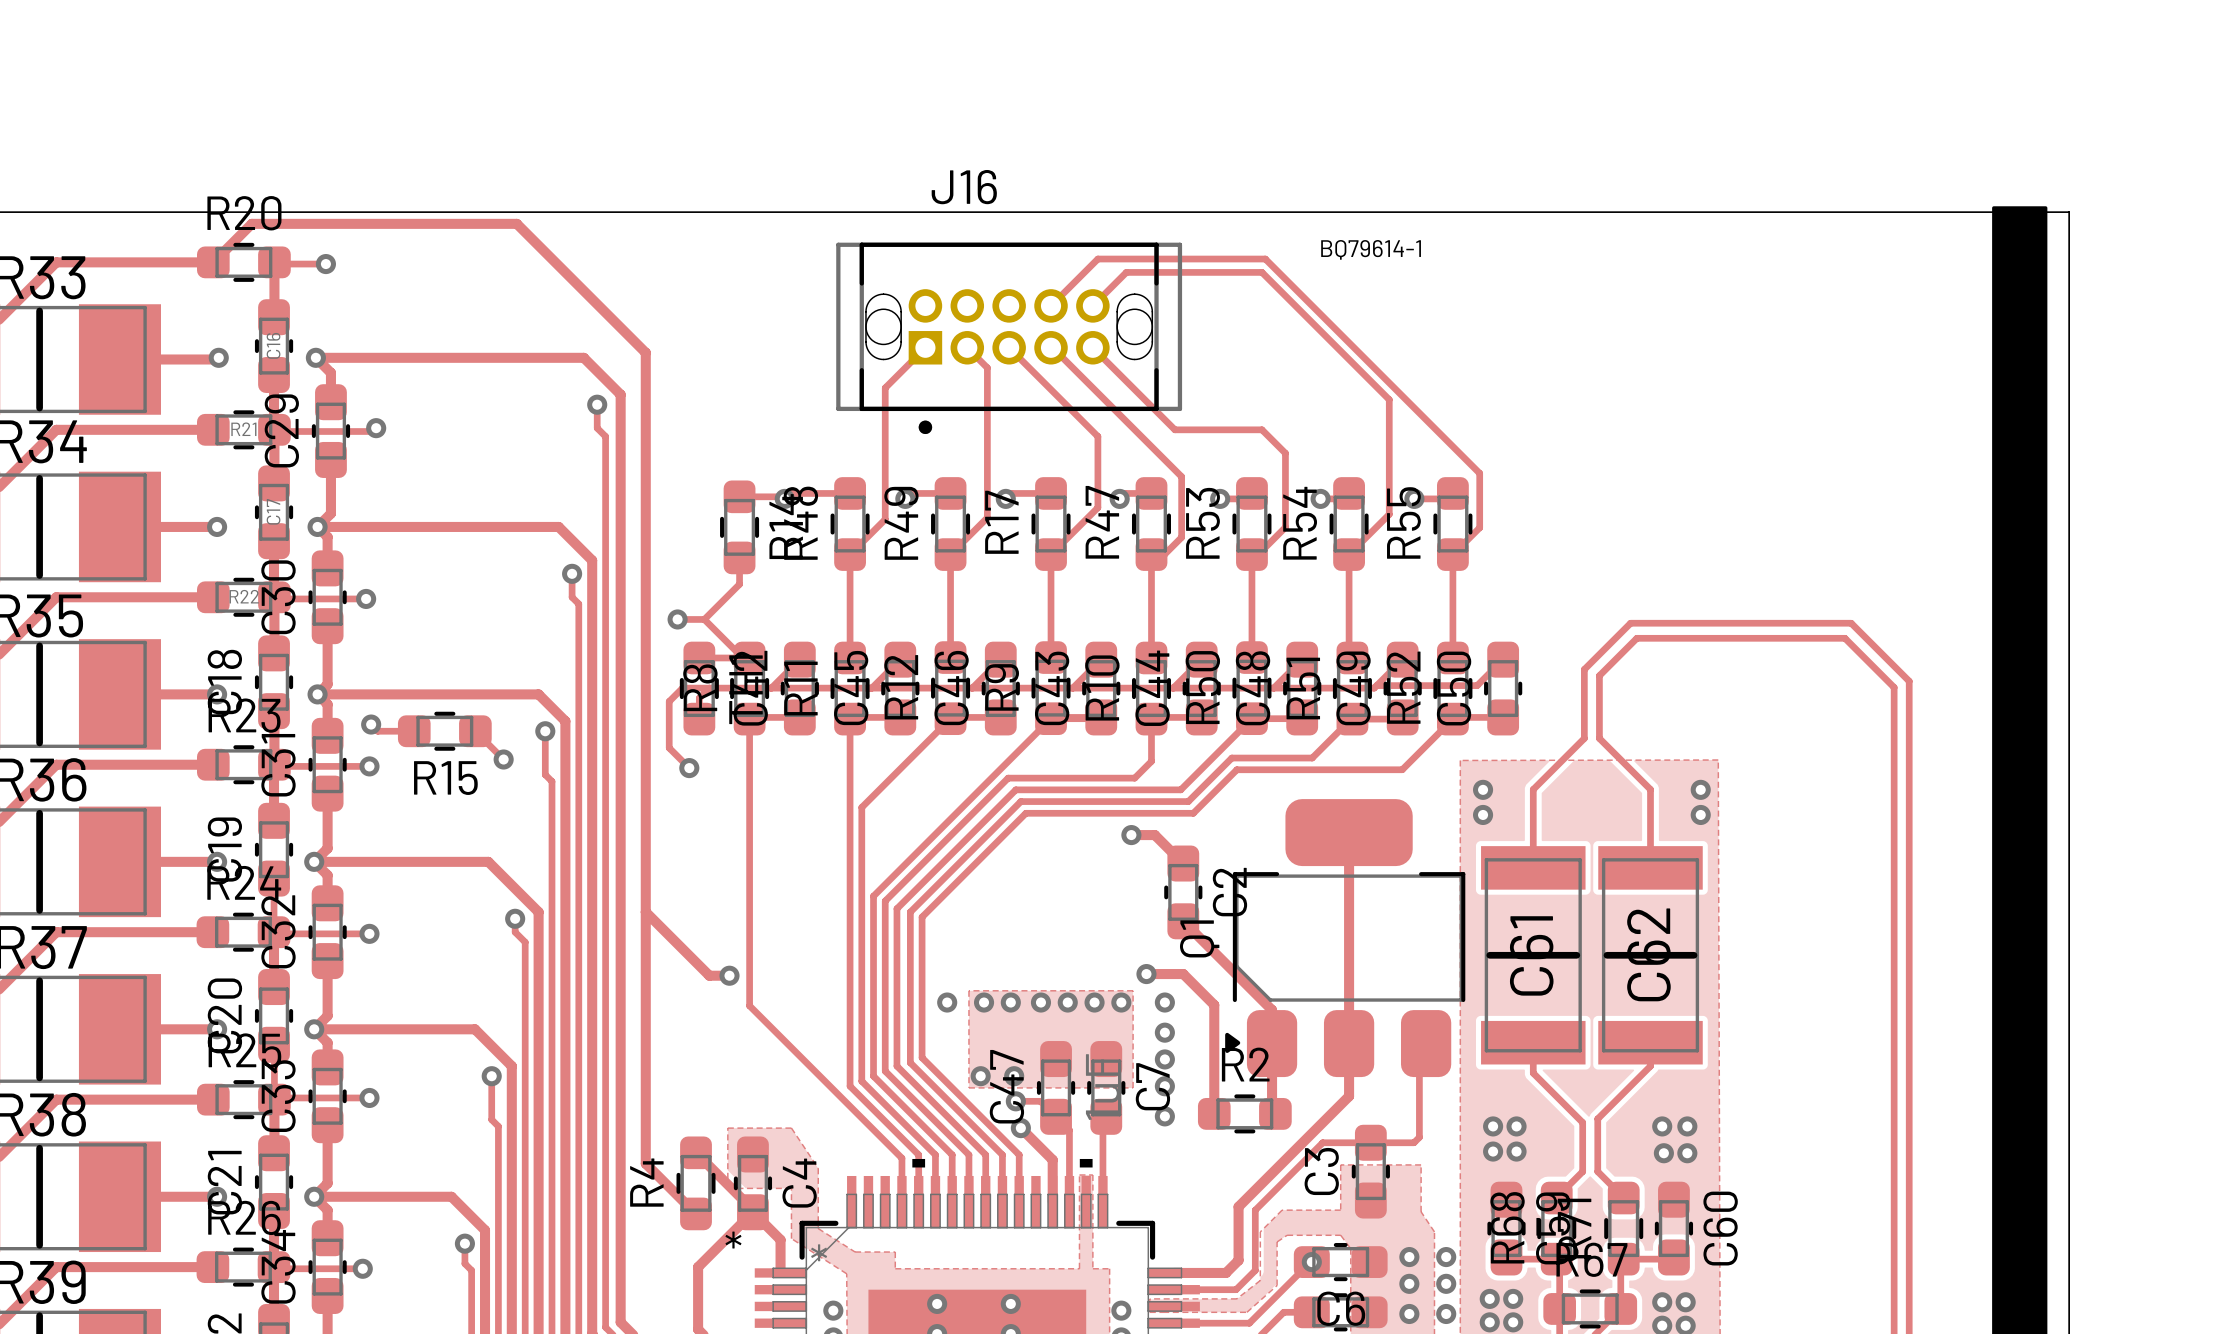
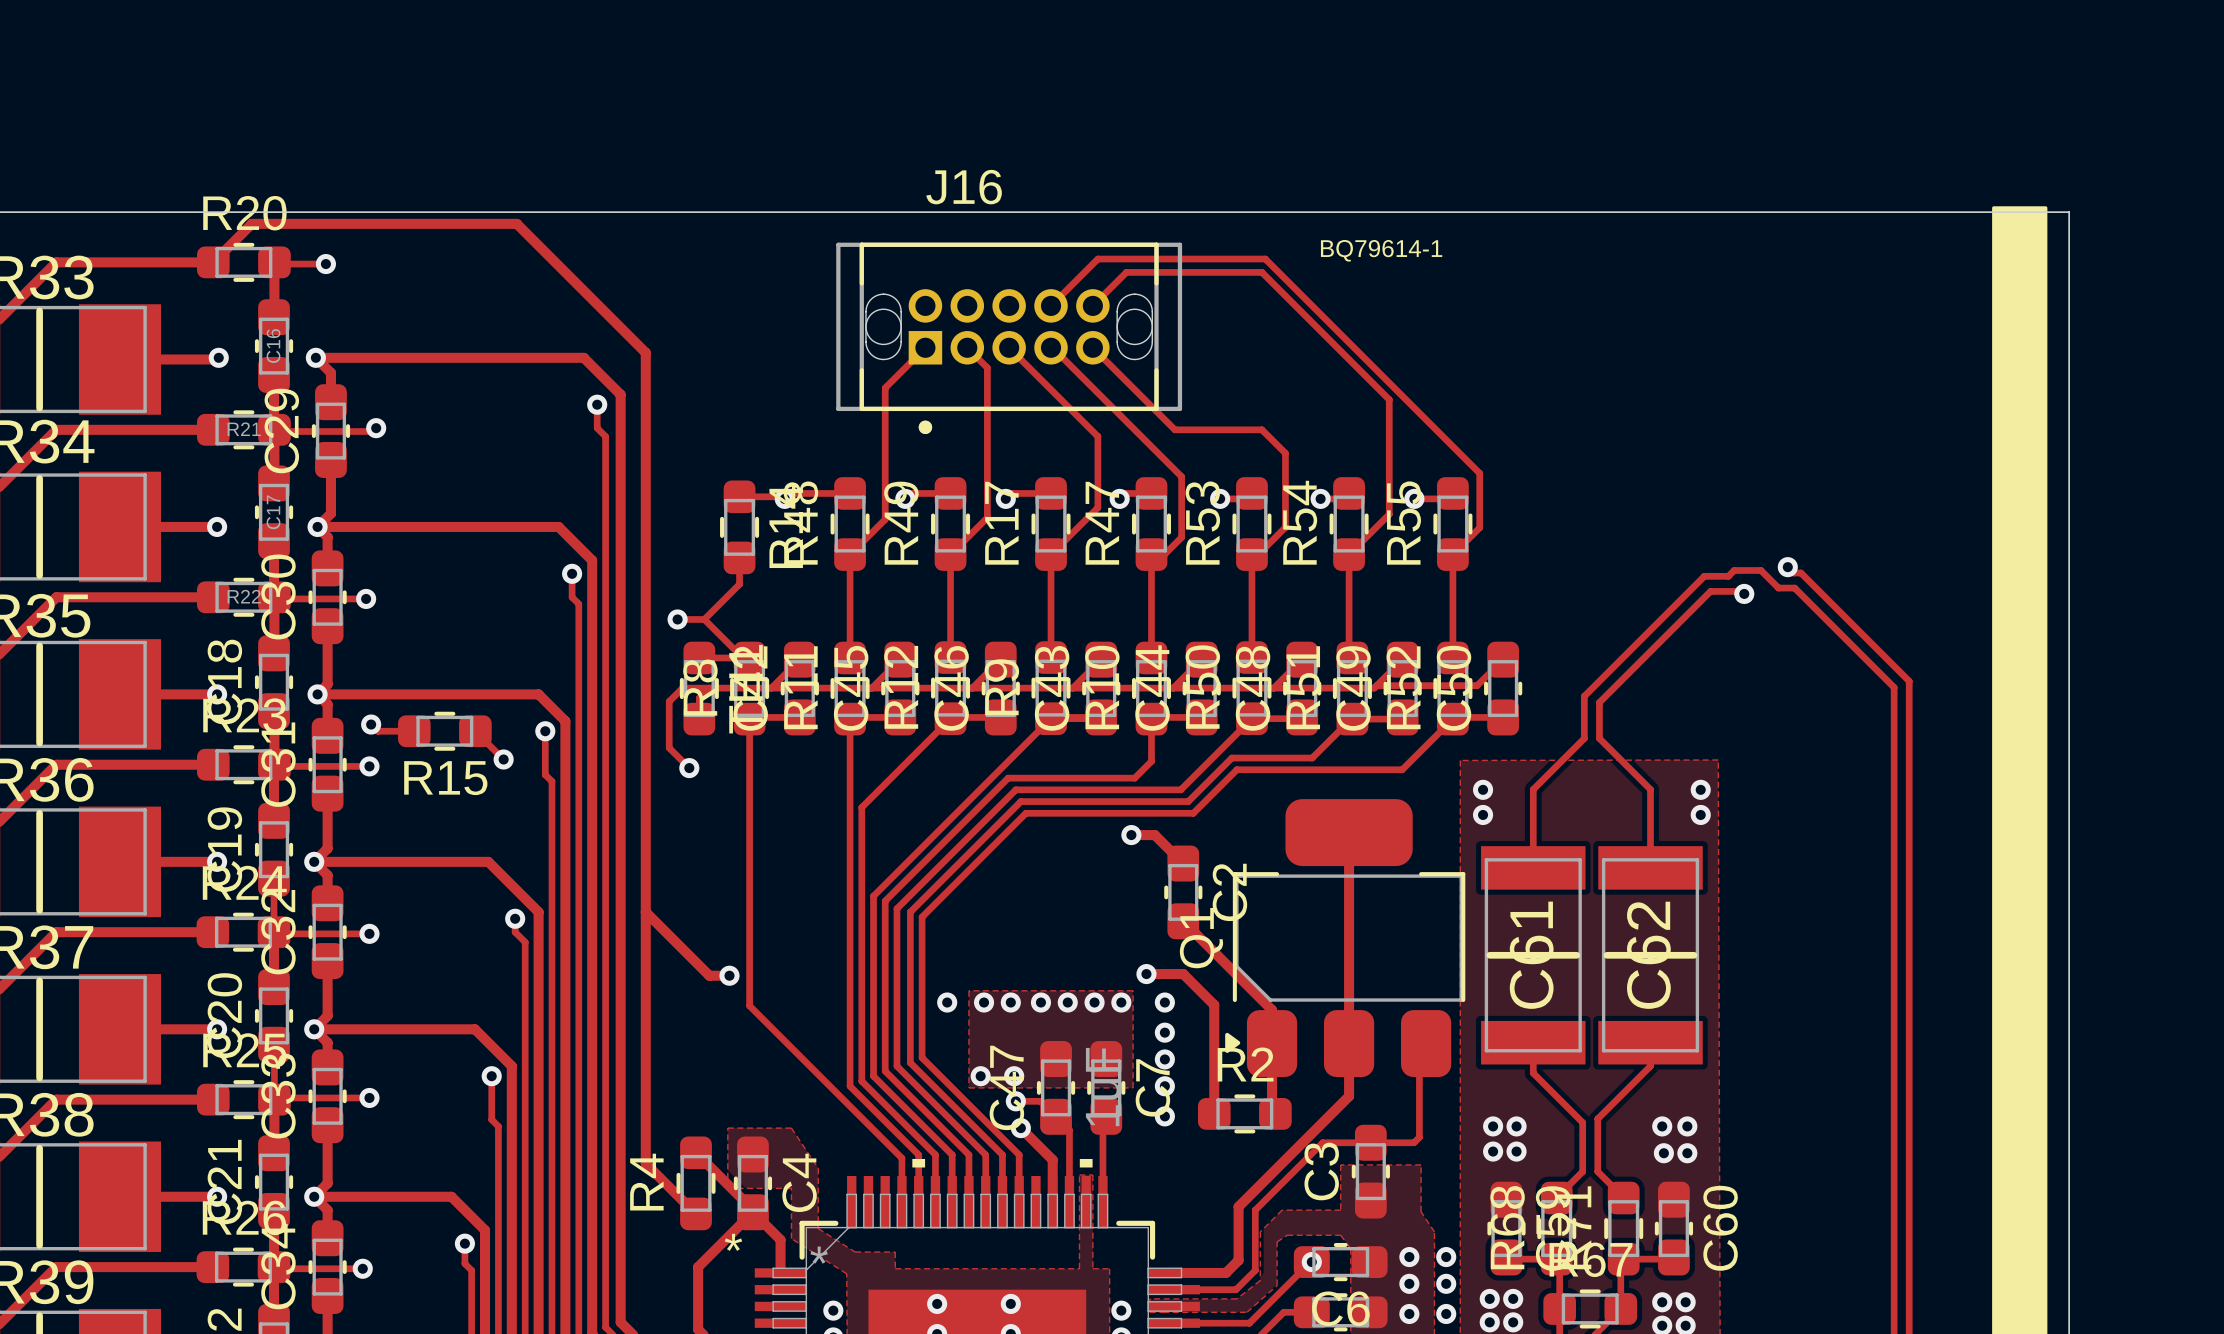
via: none -> (1787, 567)
track: none -> (1744, 593) (1741, 591) (1710, 591) (1599, 702)
via: none -> (1744, 593)
track: (1851, 623) (1630, 623) (1584, 669) (1584, 696) -> (1851, 623) (1800, 573) (1793, 573) (1787, 567)
track: (1844, 638) (1636, 638) (1599, 675) (1599, 702) -> (1844, 638) (1794, 588) (1778, 588) (1761, 570) (1734, 570) (1728, 576) (1704, 576) (1584, 696)

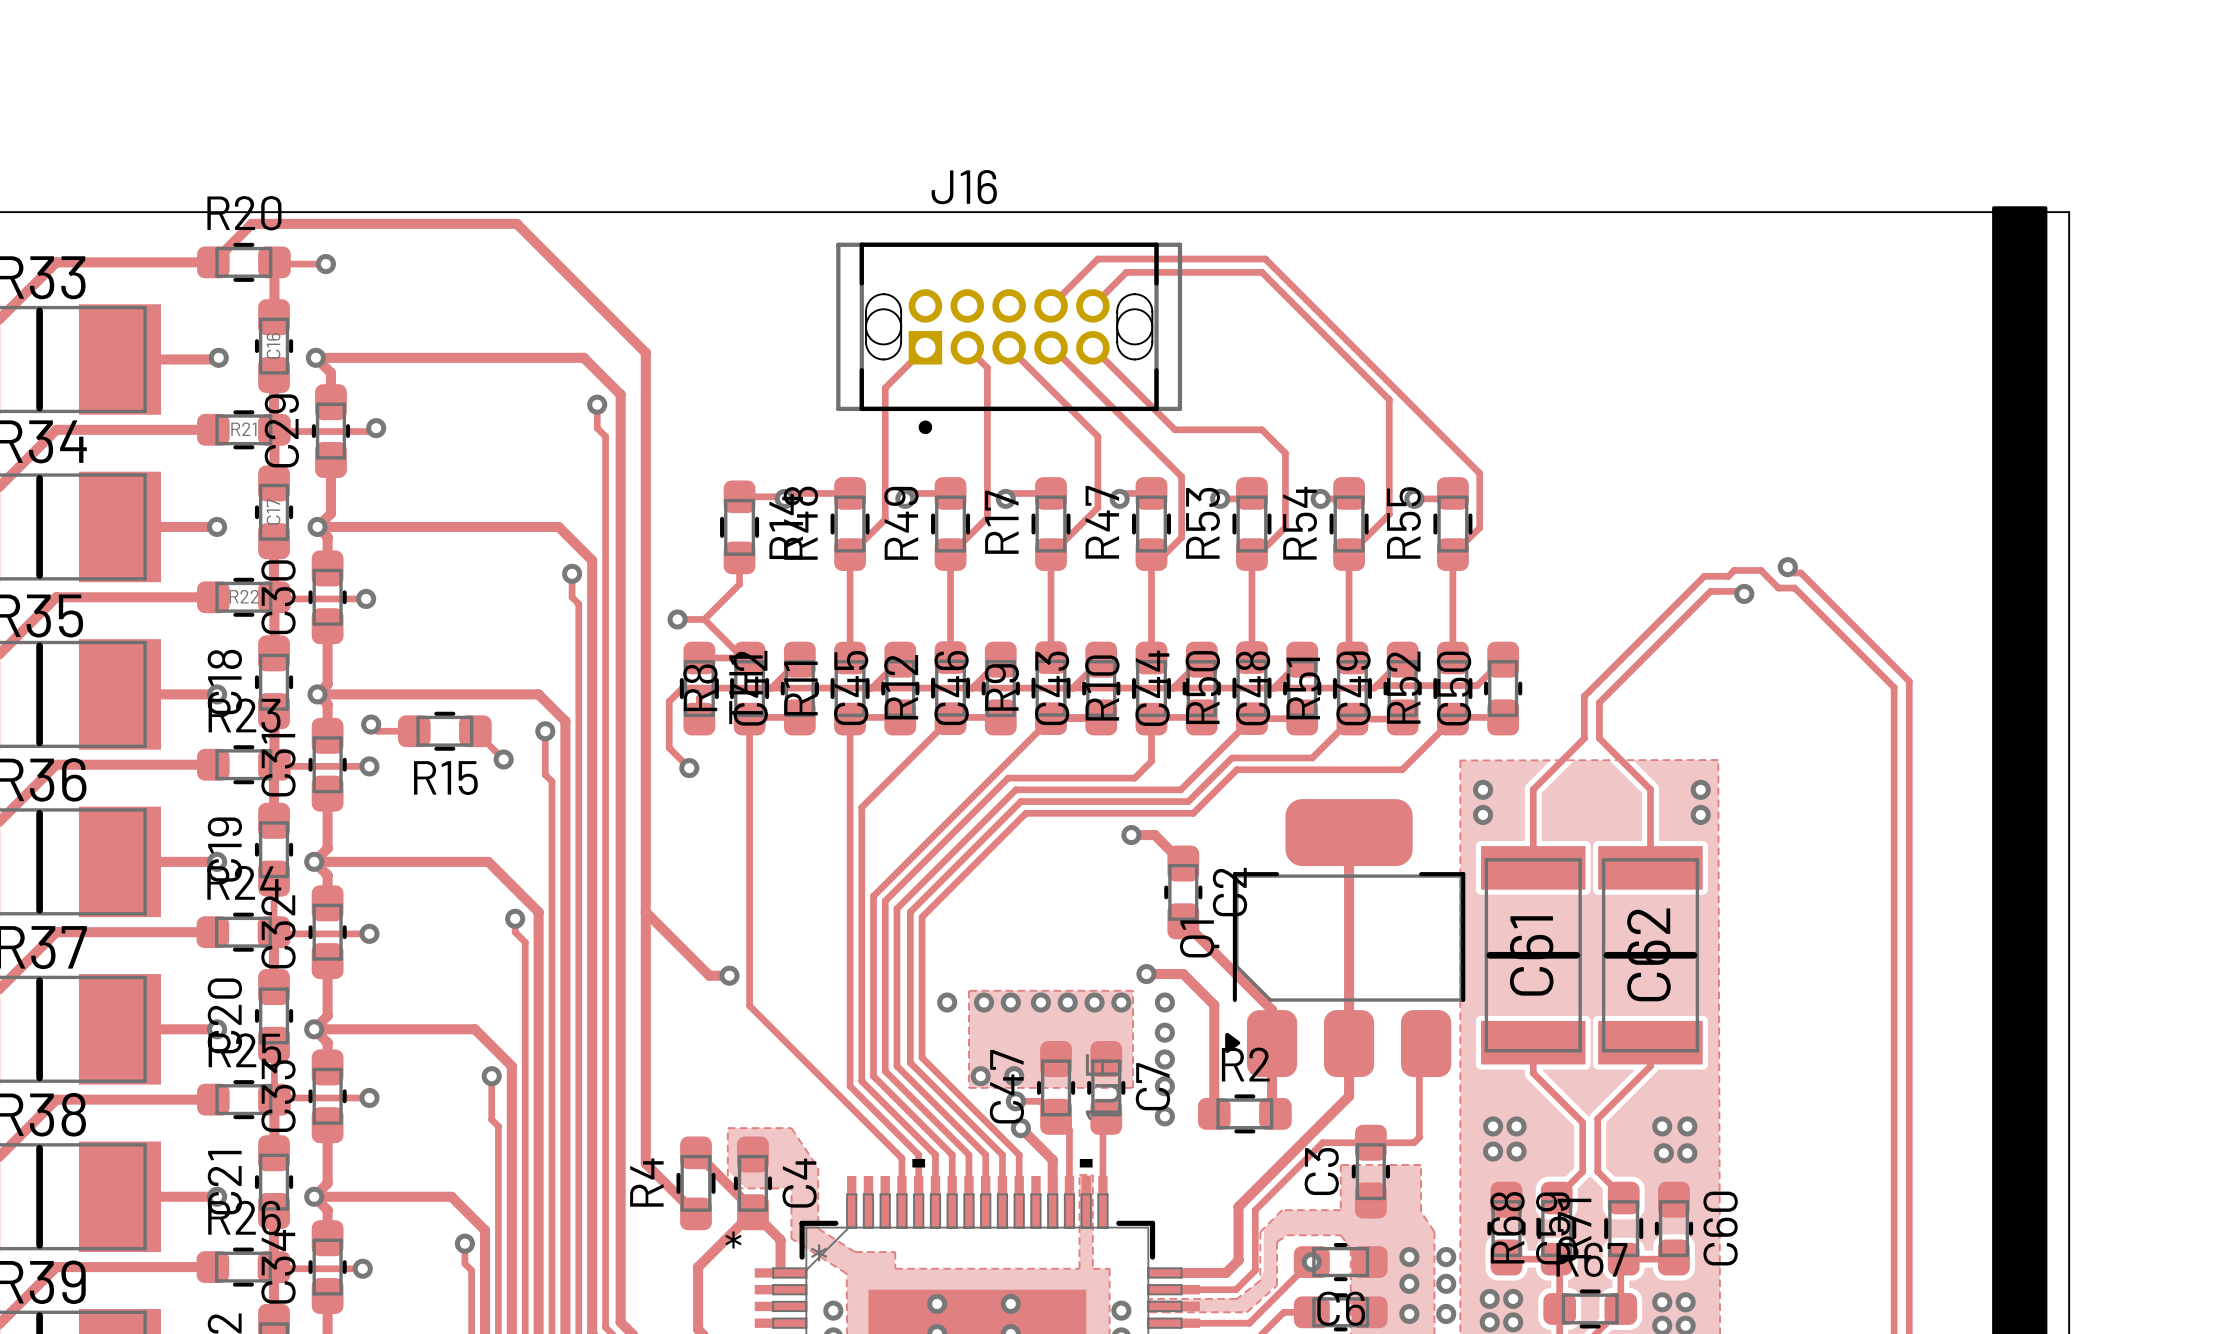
text: BQ79614-1 (1381, 250) -> none

